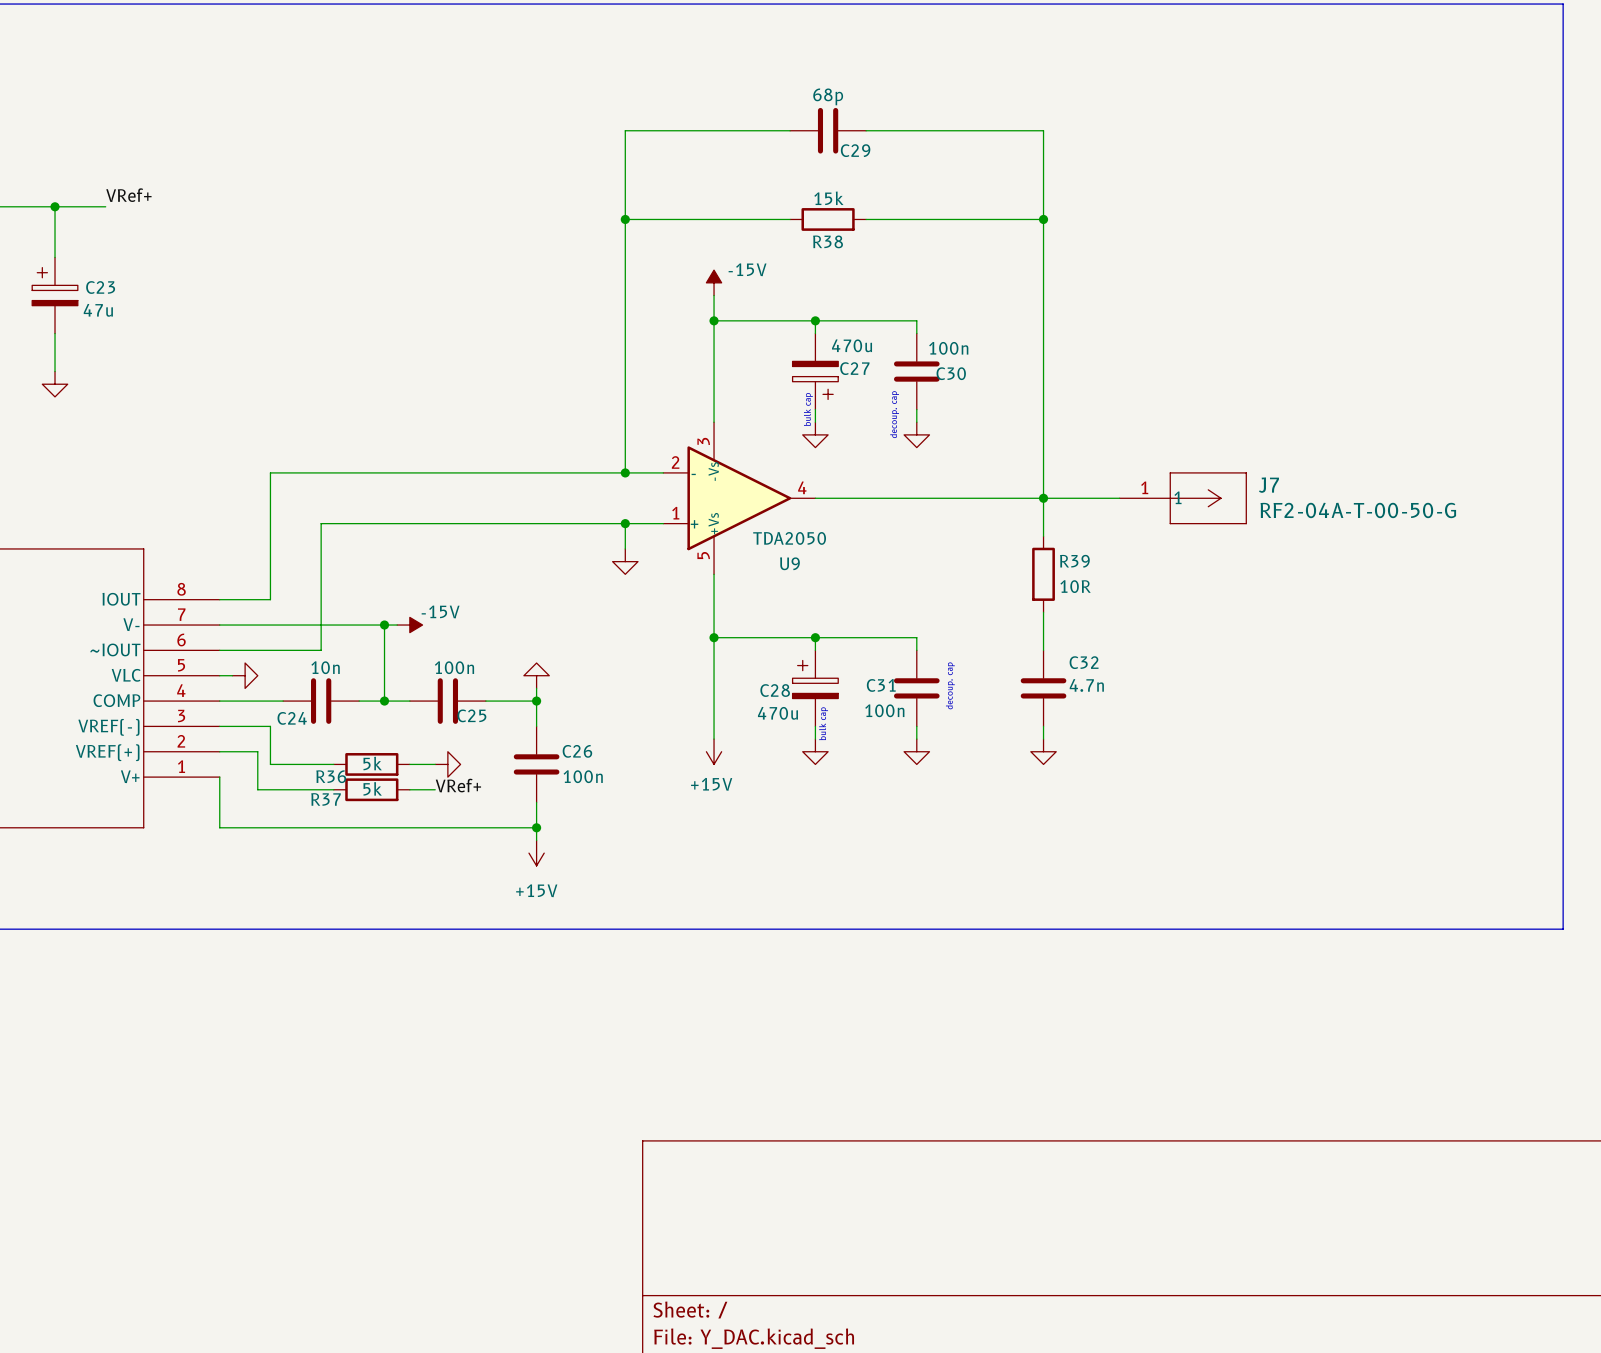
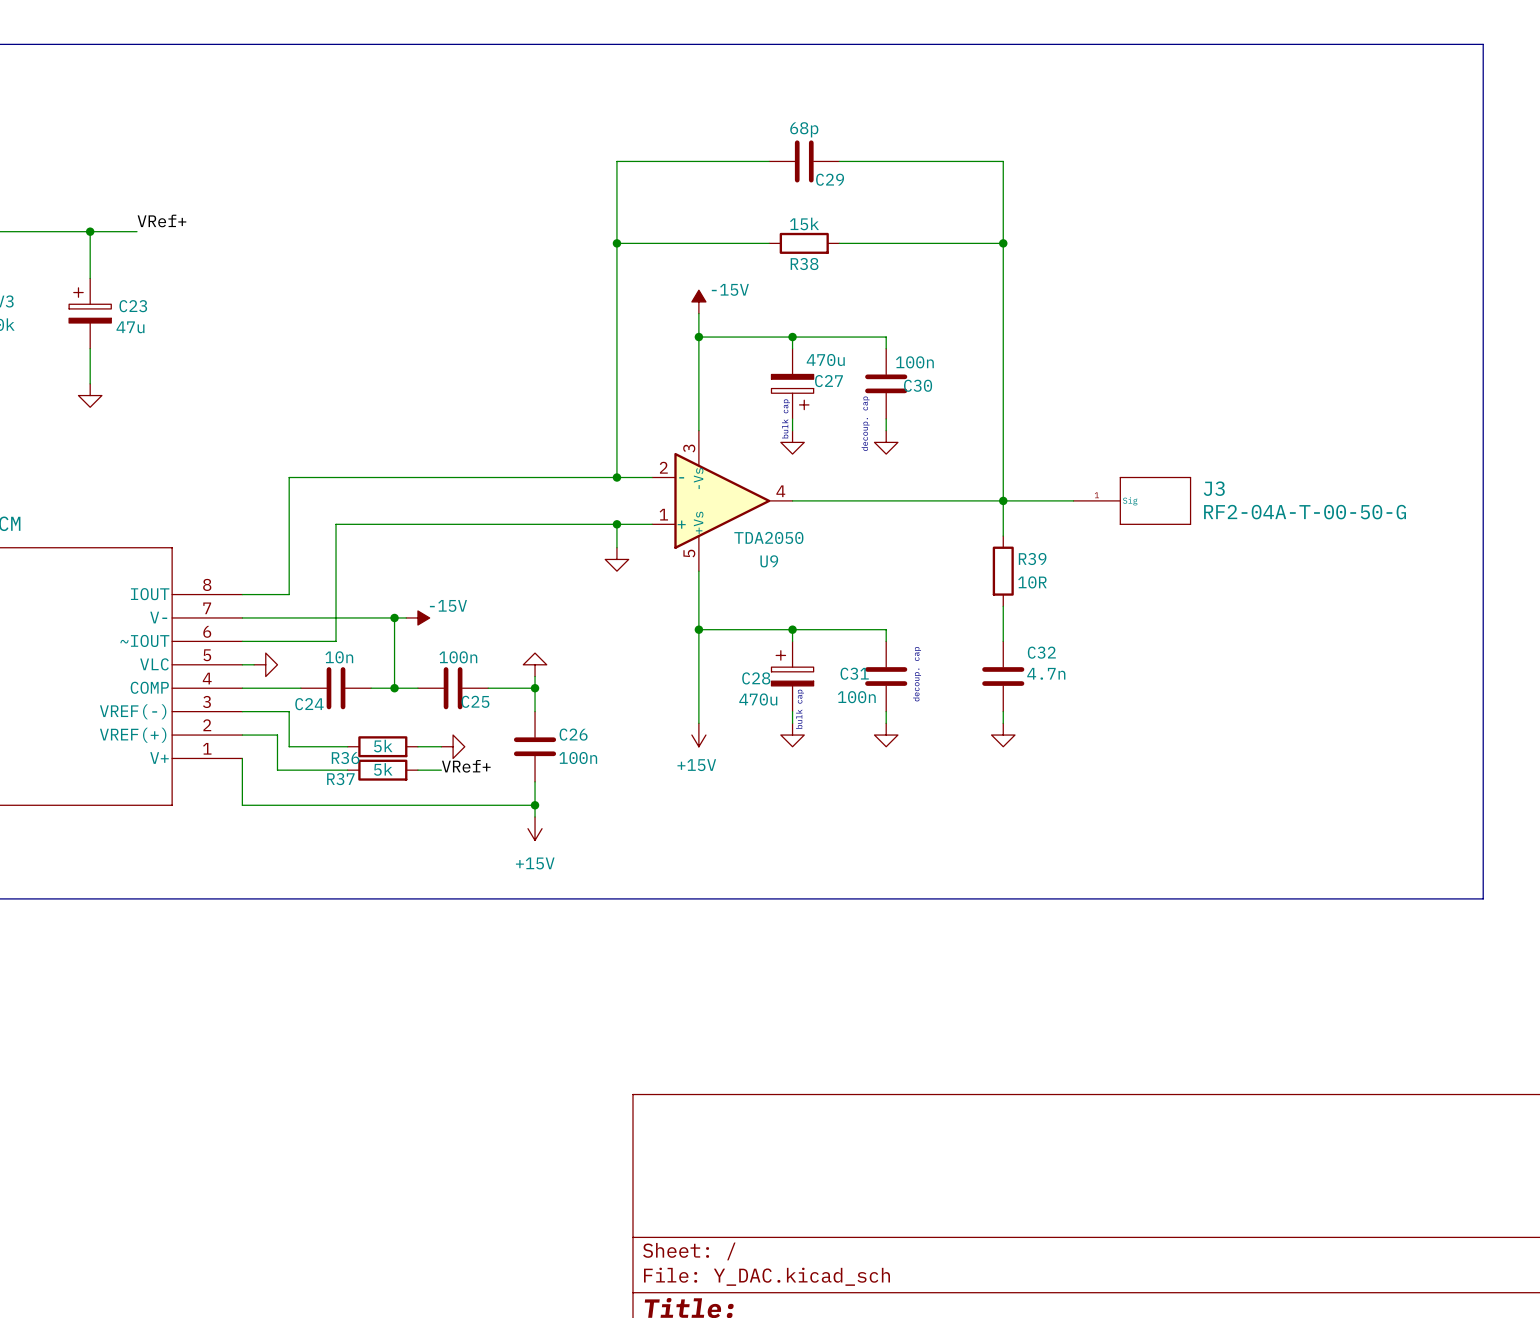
J7: RF2-04A-T-00-50-G (1183, 498) -> none
J3: none -> RF2-04A-T-00-50-G (1132, 500)

